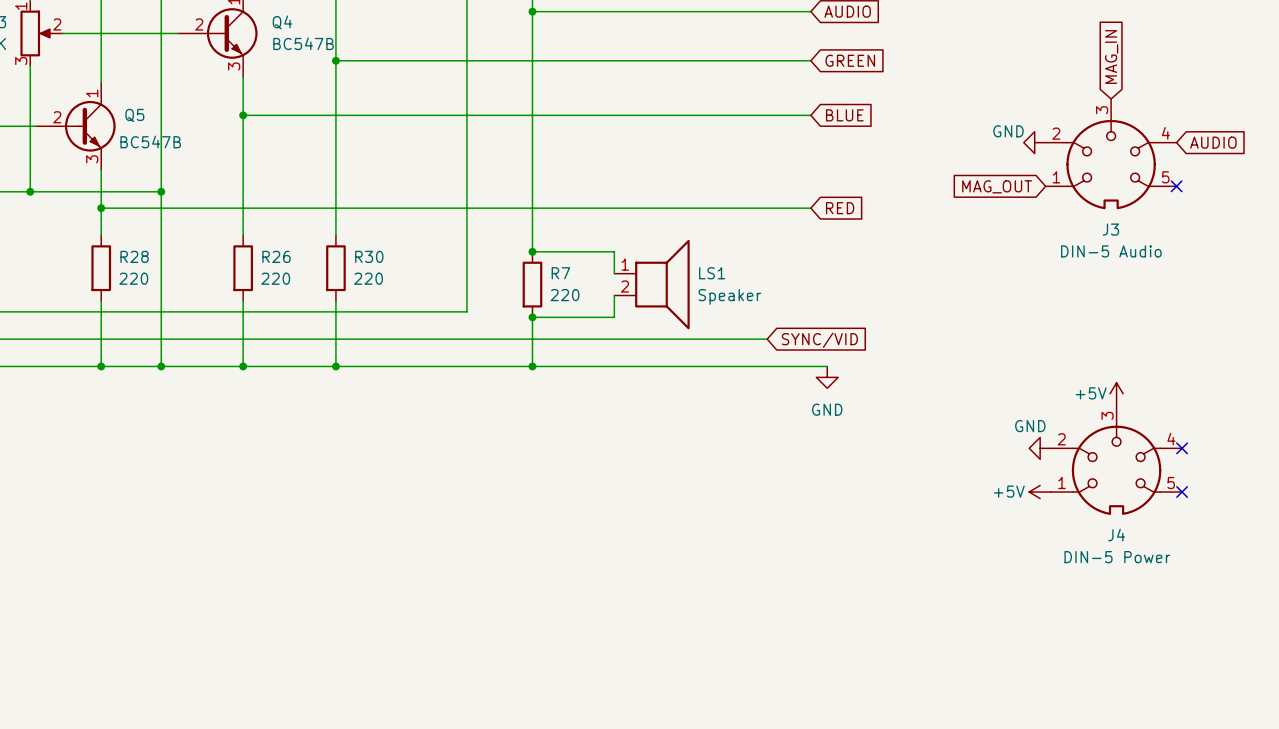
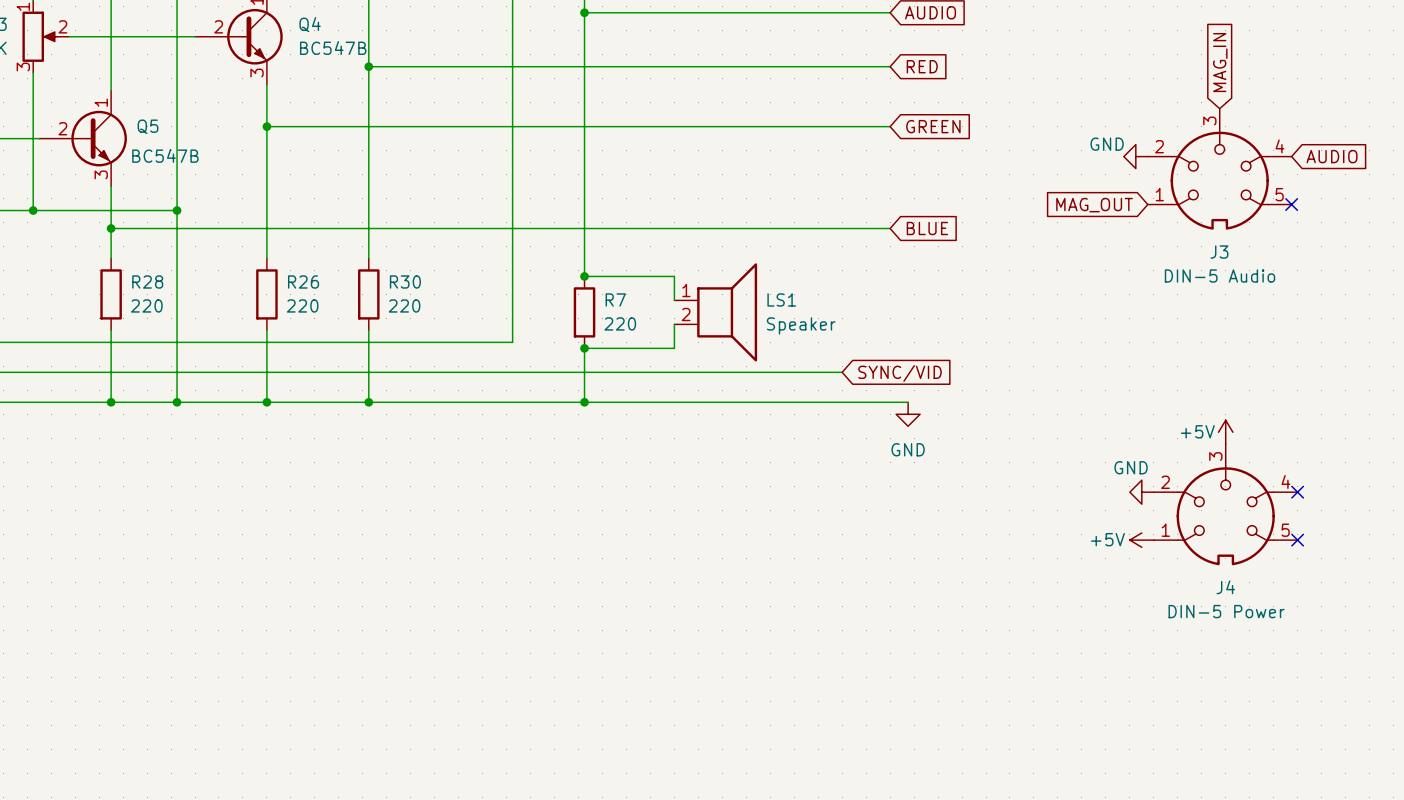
global label: GREEN (850, 60) -> RED (922, 66)
global label: BLUE (844, 115) -> GREEN (933, 126)
global label: RED (840, 208) -> BLUE (927, 228)

